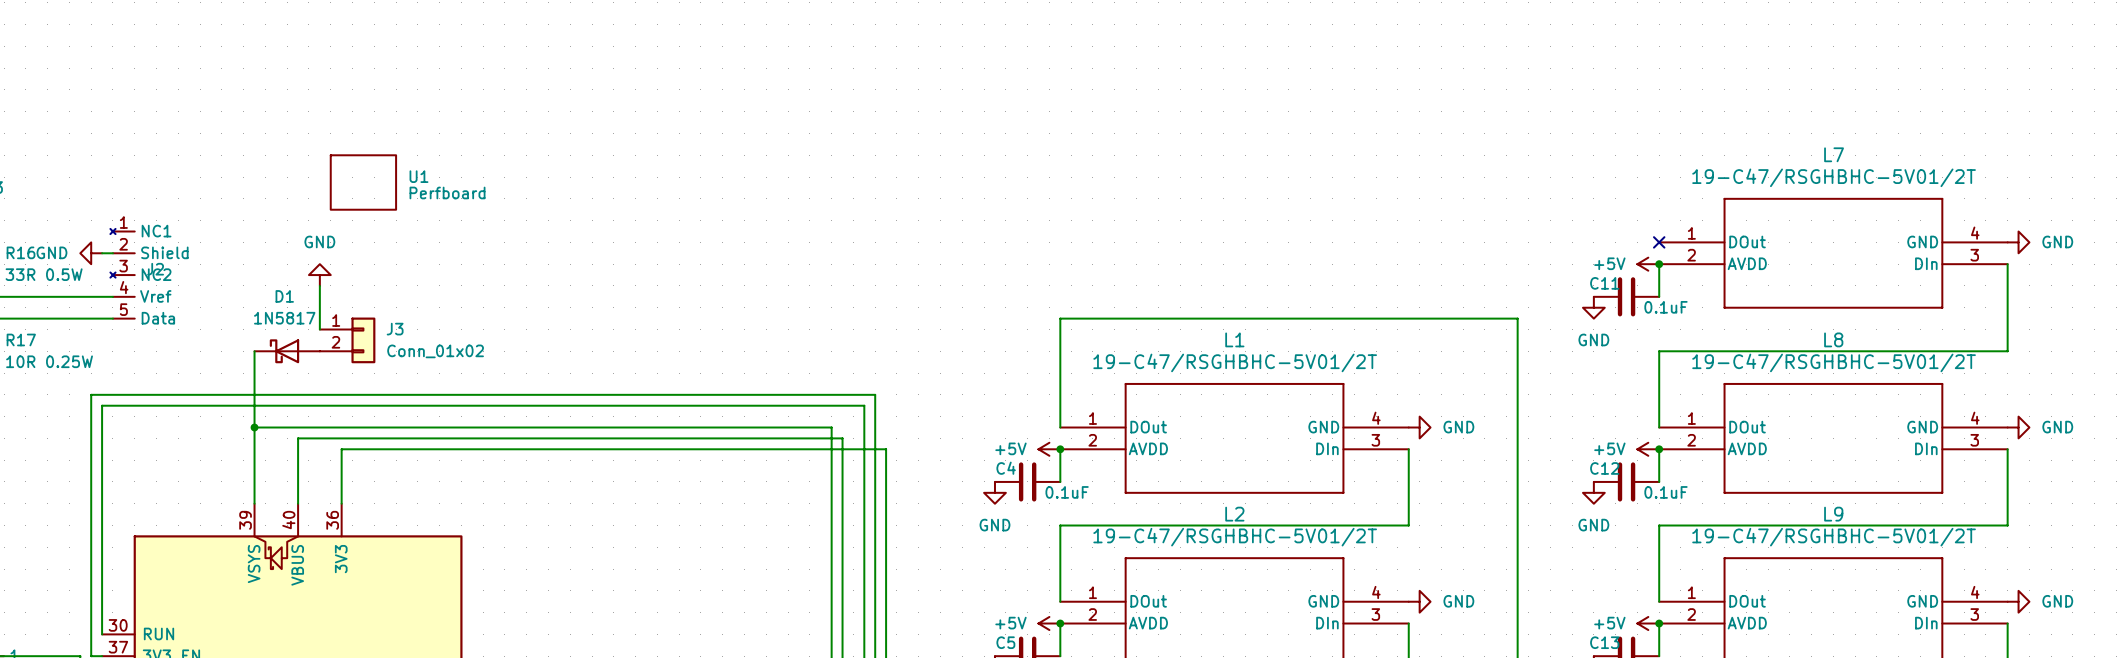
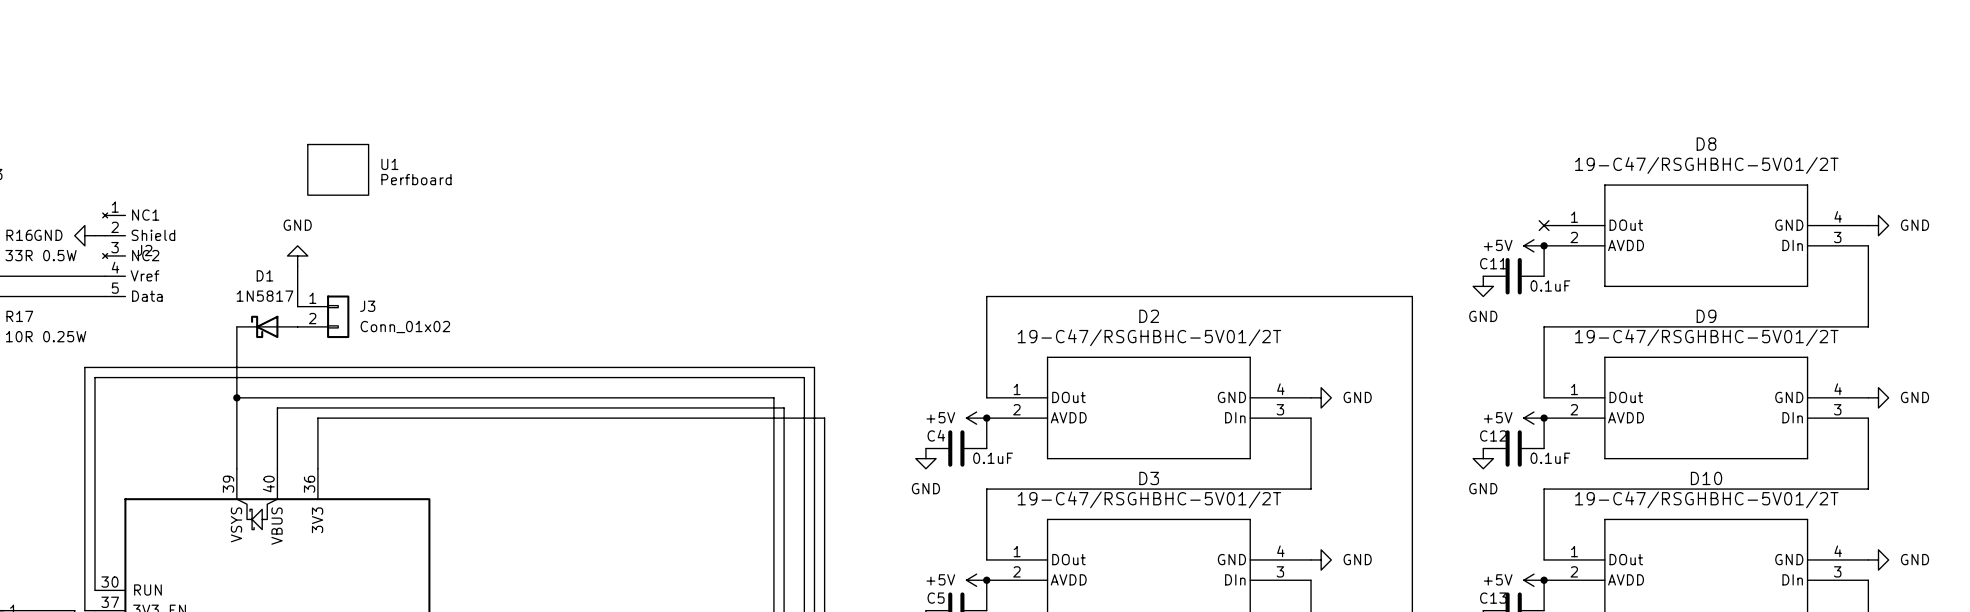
L7 name: L7 (1834, 154) -> D8 (1706, 144)
L1 name: L1 (1234, 339) -> D2 (1149, 316)
L8 name: L8 (1833, 339) -> D9 (1706, 316)
L2 name: L2 (1234, 514) -> D3 (1149, 478)
L9 name: L9 (1833, 514) -> D10 (1706, 478)

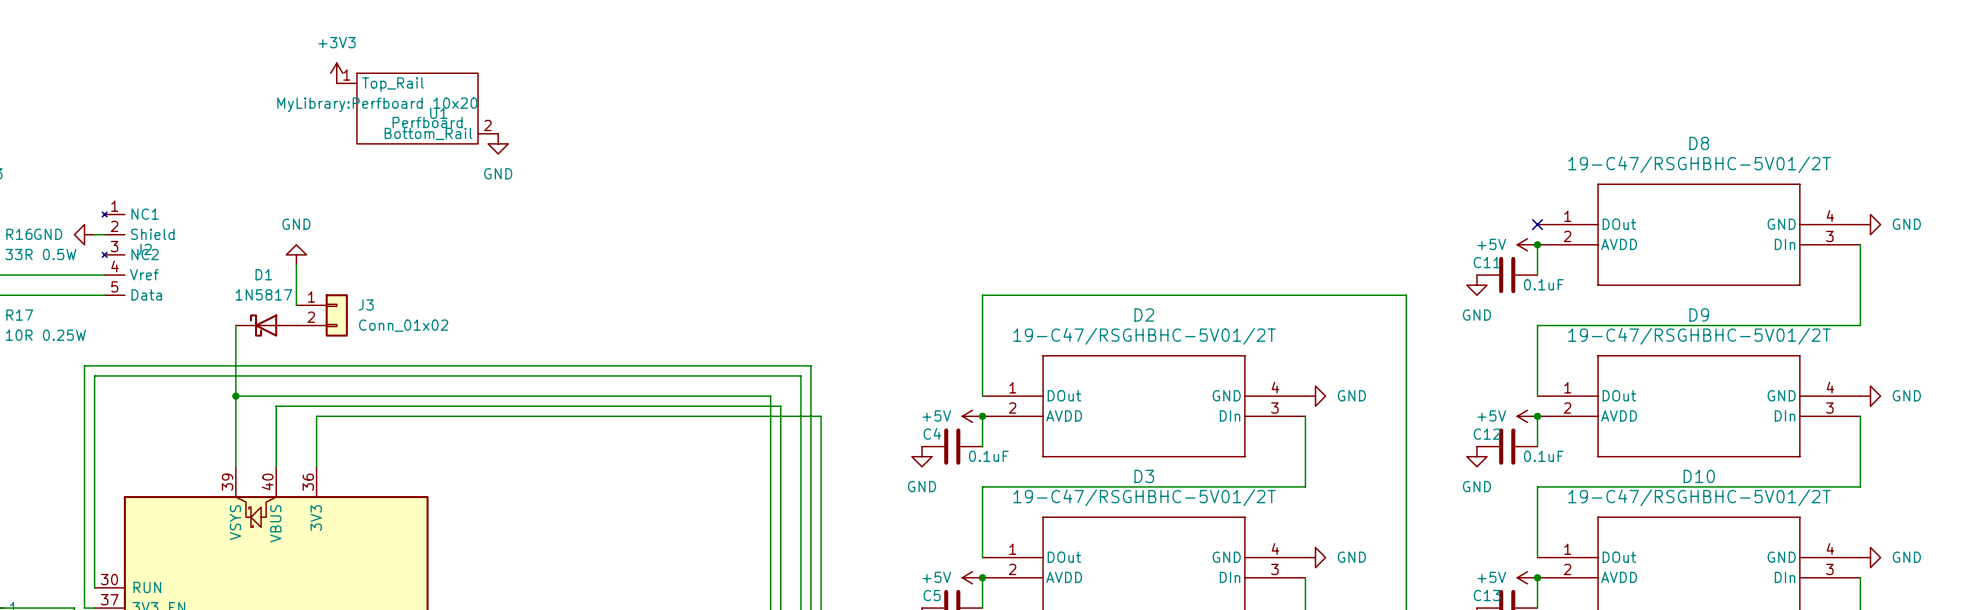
power symbol: none -> +3V3 (336, 73)
U1 text: none -> MyLibrary:Perfboard 10x20 (377, 104)
U1 symbol: [307, 144, 369, 196] -> [336, 73, 499, 144]
power symbol: none -> GND (498, 143)
U1 name position: U1 (389, 164) -> U1 (438, 113)
U1 value position: Perfboard (416, 179) -> Perfboard (427, 122)

